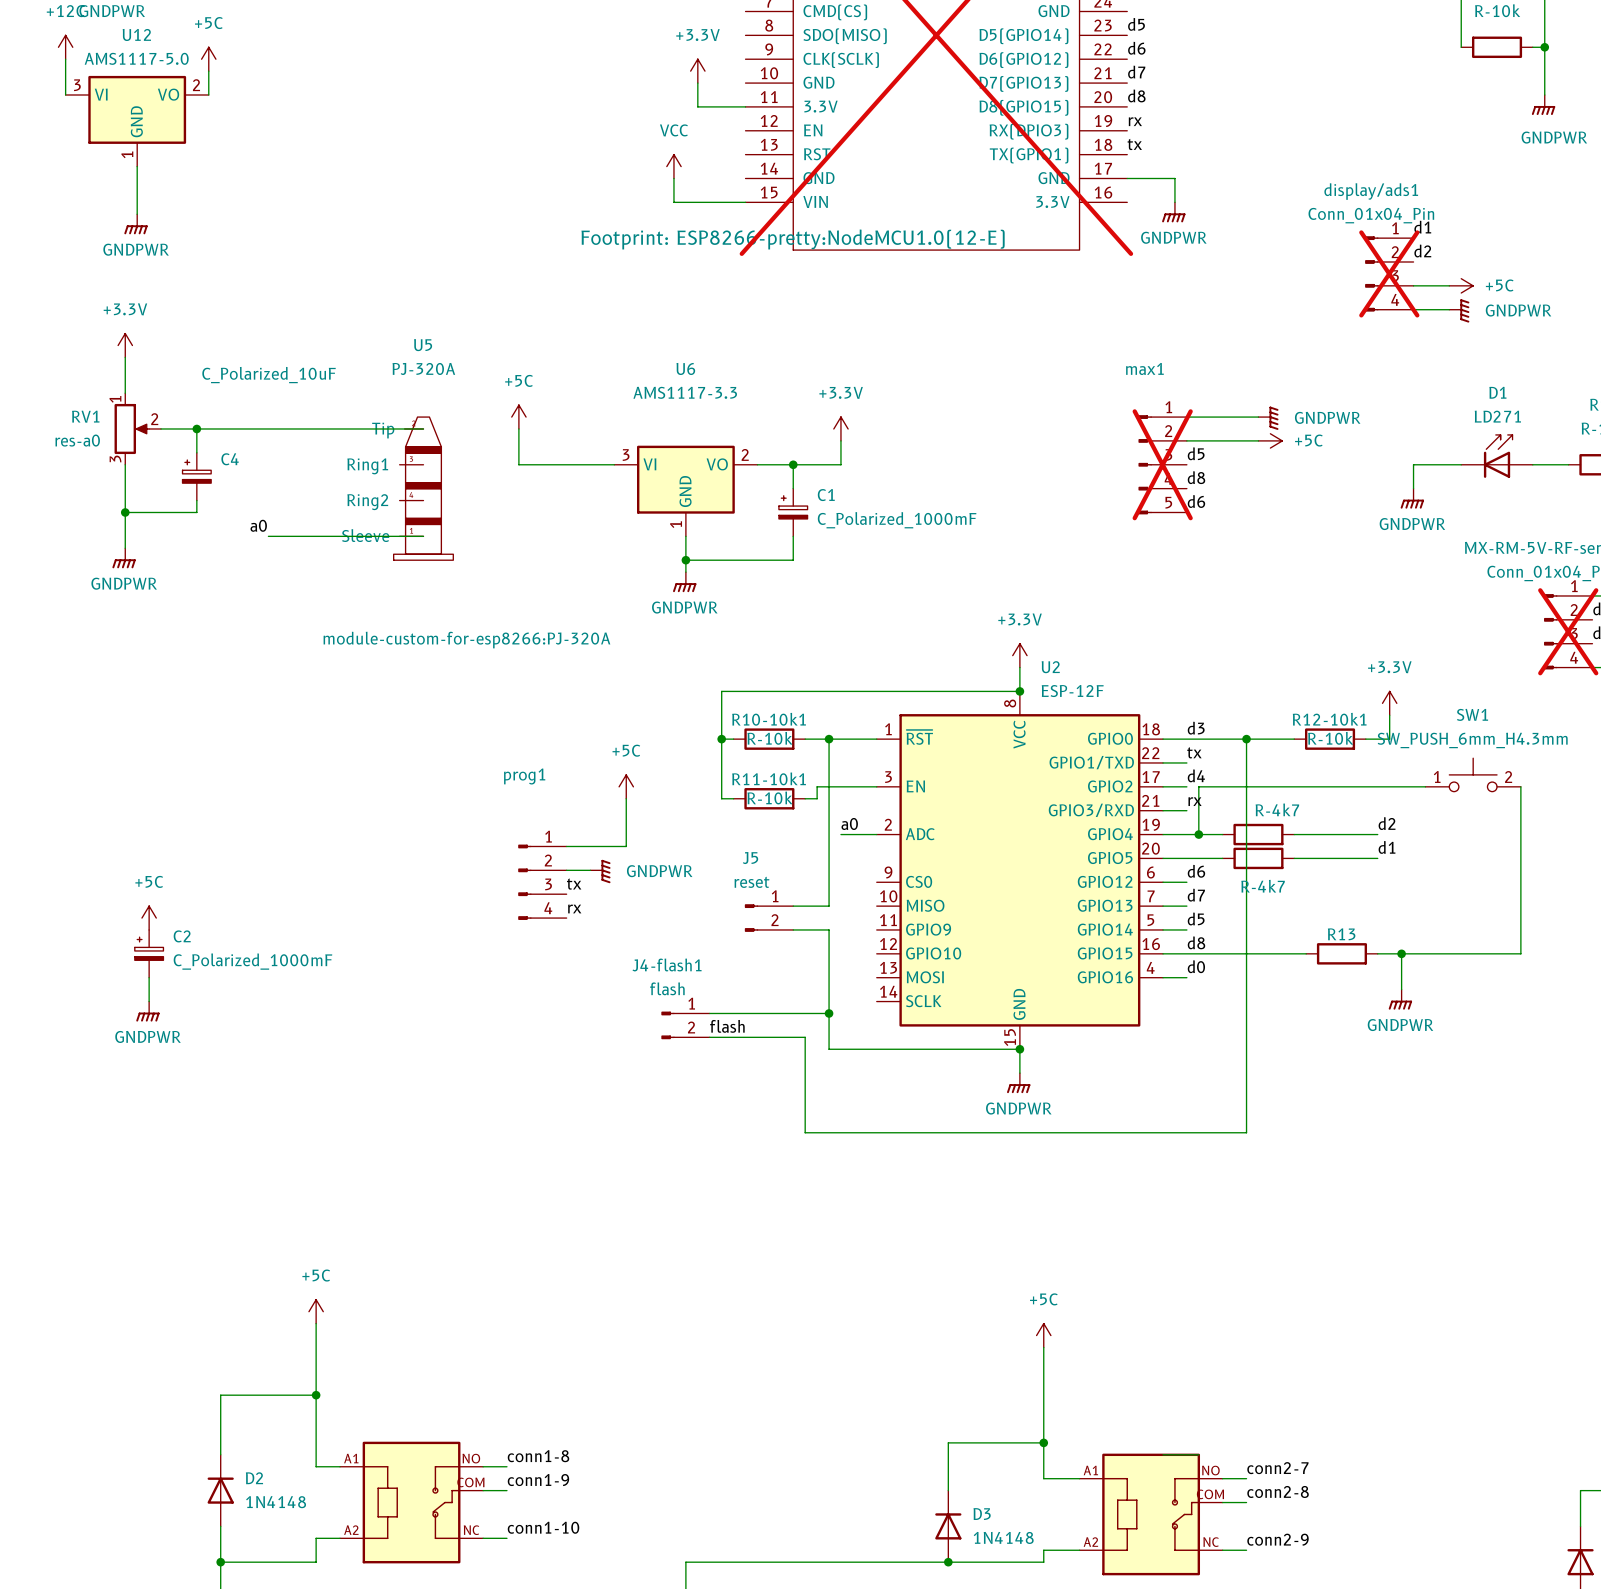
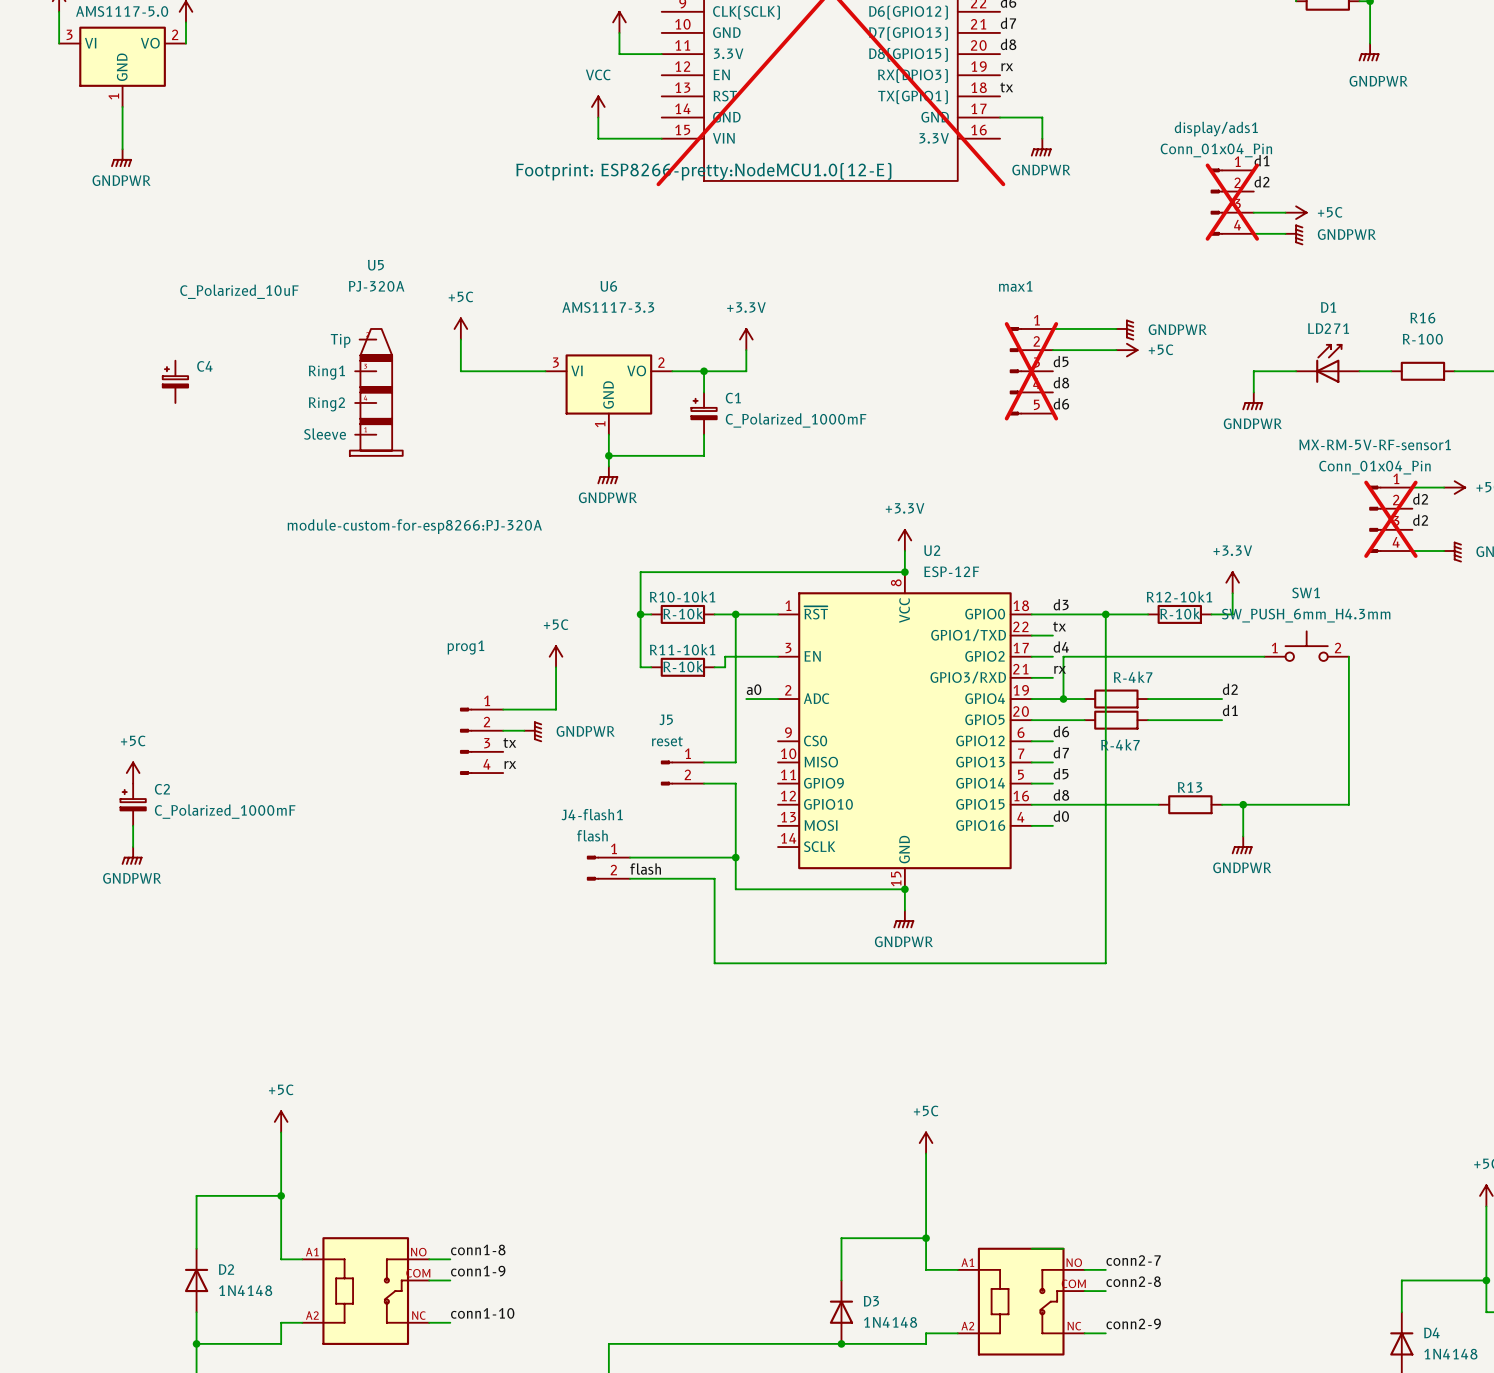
power symbol: +3.3V (125, 345) -> none
wire: (125, 357) (125, 393) -> none
RV1: res-a0 (137, 428) -> none
wire: (161, 428) (423, 428) -> none
wire: (196, 428) (196, 452) -> none
junction: (196, 428) -> none
wire: (125, 464) (125, 548) -> none
wire: (196, 500) (196, 512) (125, 512) -> none
junction: (125, 512) -> none
label: a0 (258, 525) -> none
wire: (268, 536) (423, 536) -> none
power symbol: GNDPWR (124, 558) -> none

